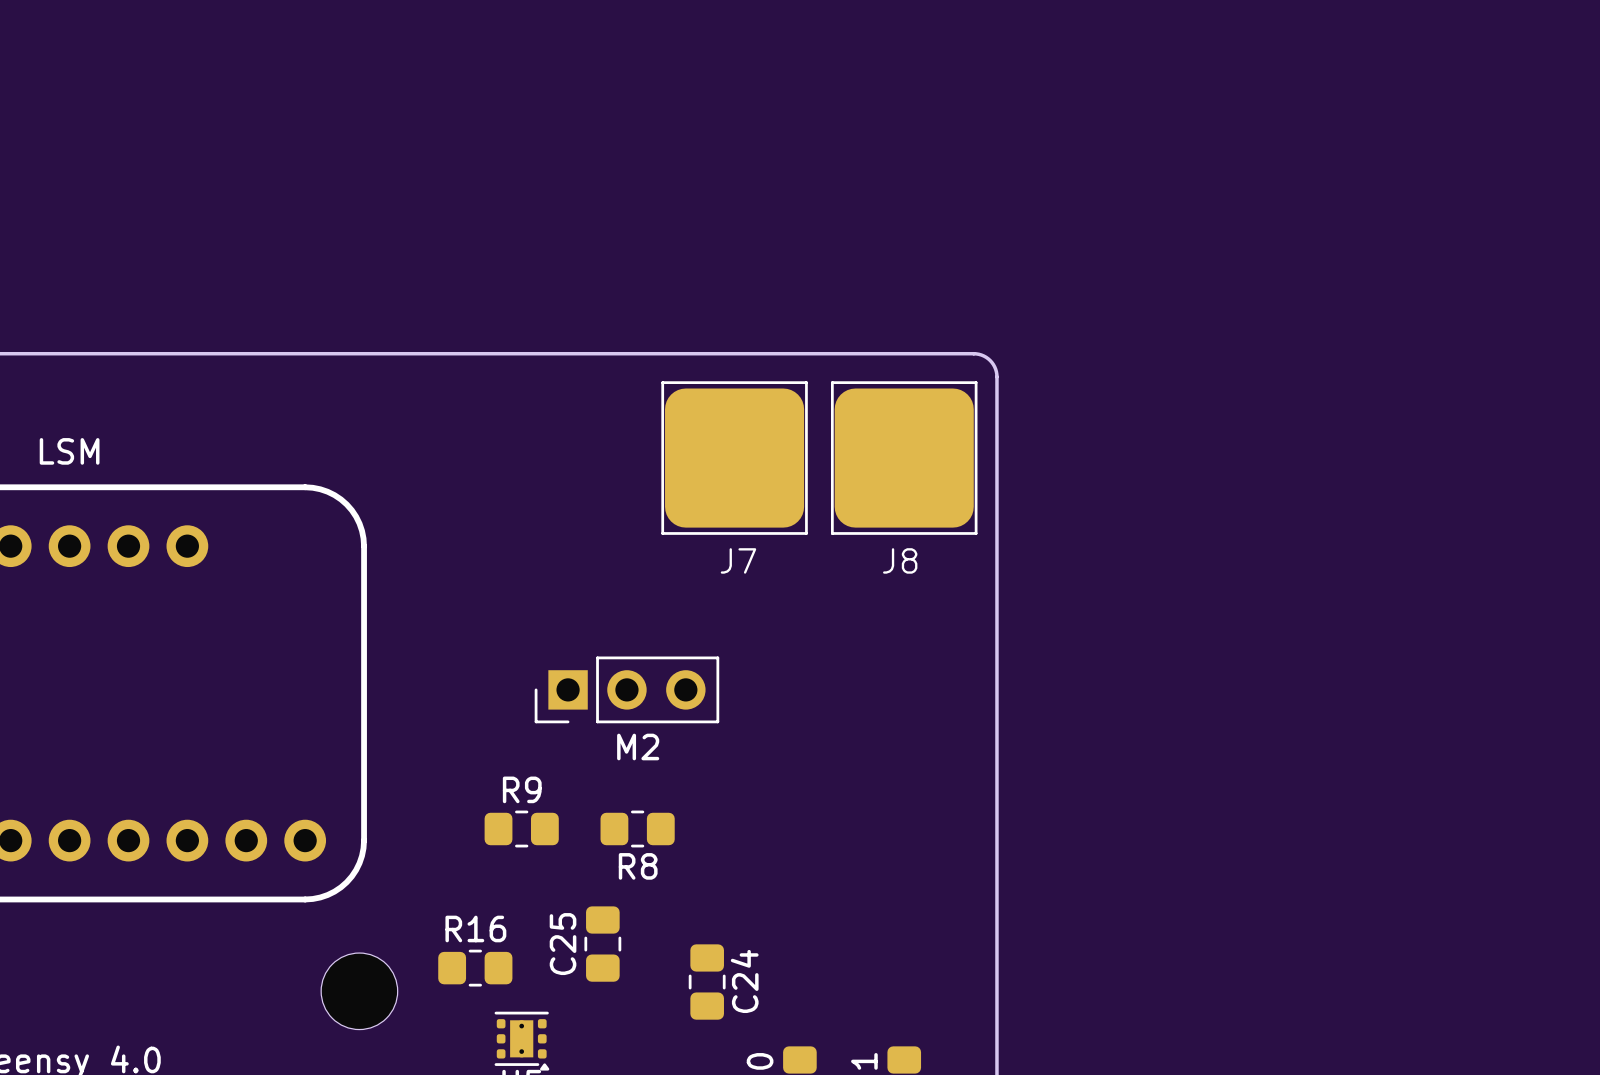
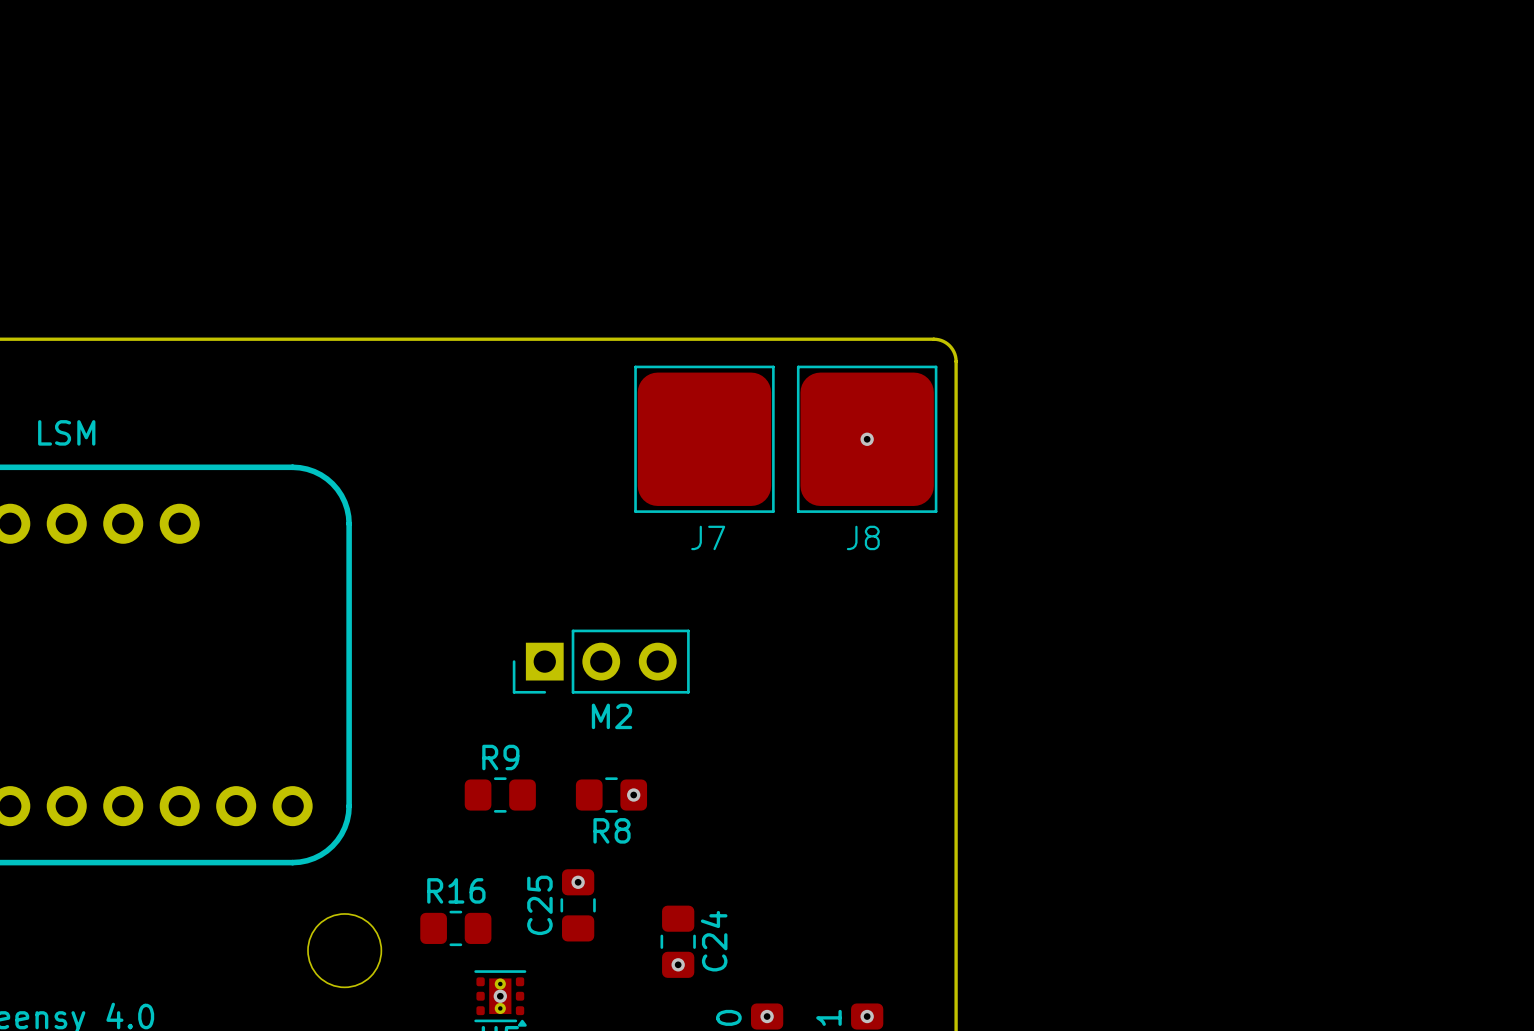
via: none -> (867, 439)
via: none -> (633, 795)
via: none -> (578, 882)
via: none -> (678, 964)
via: none -> (500, 996)
via: none -> (767, 1016)
via: none -> (867, 1016)

